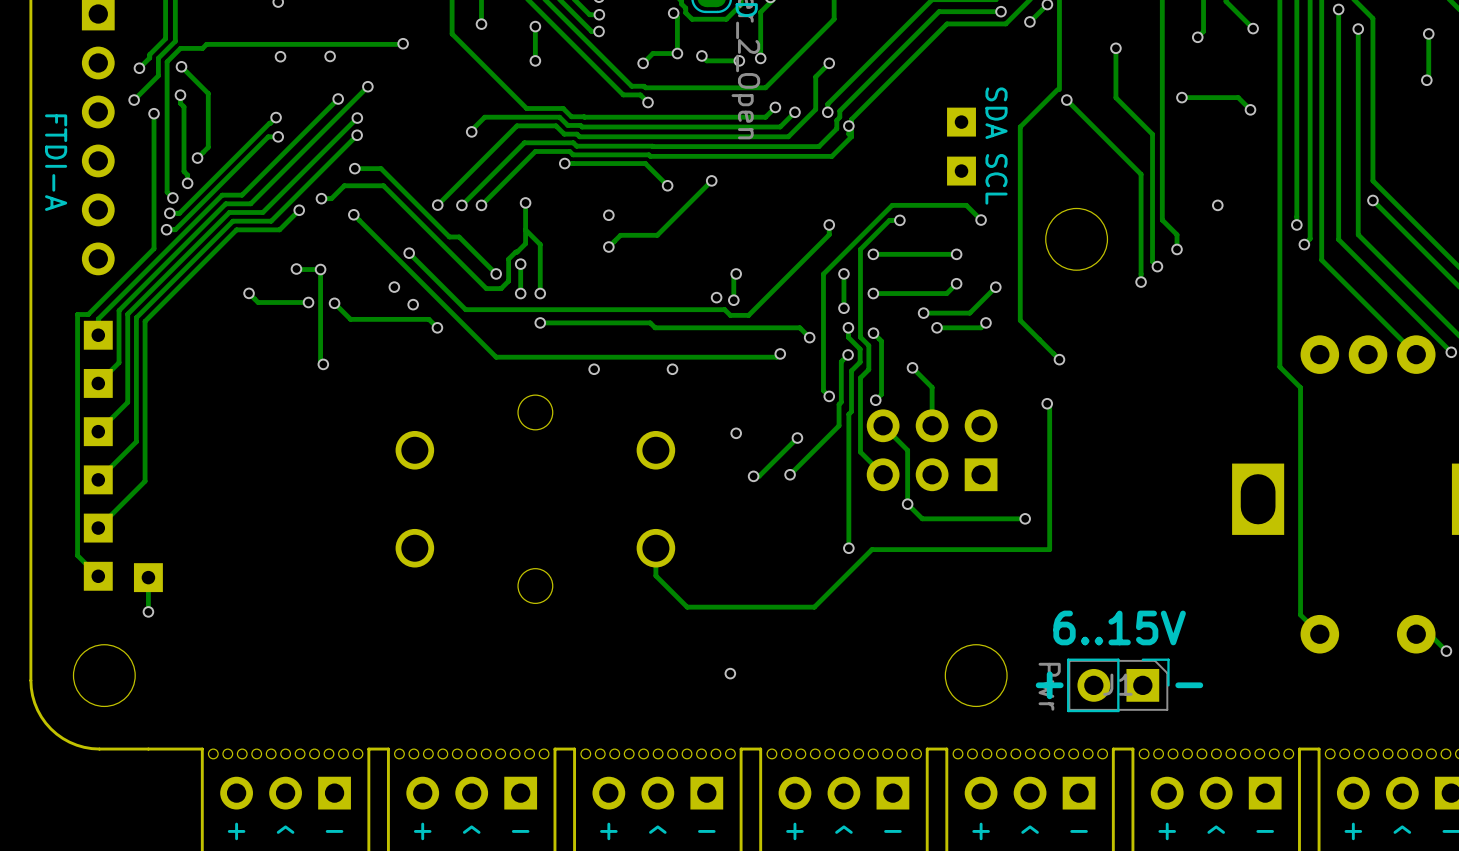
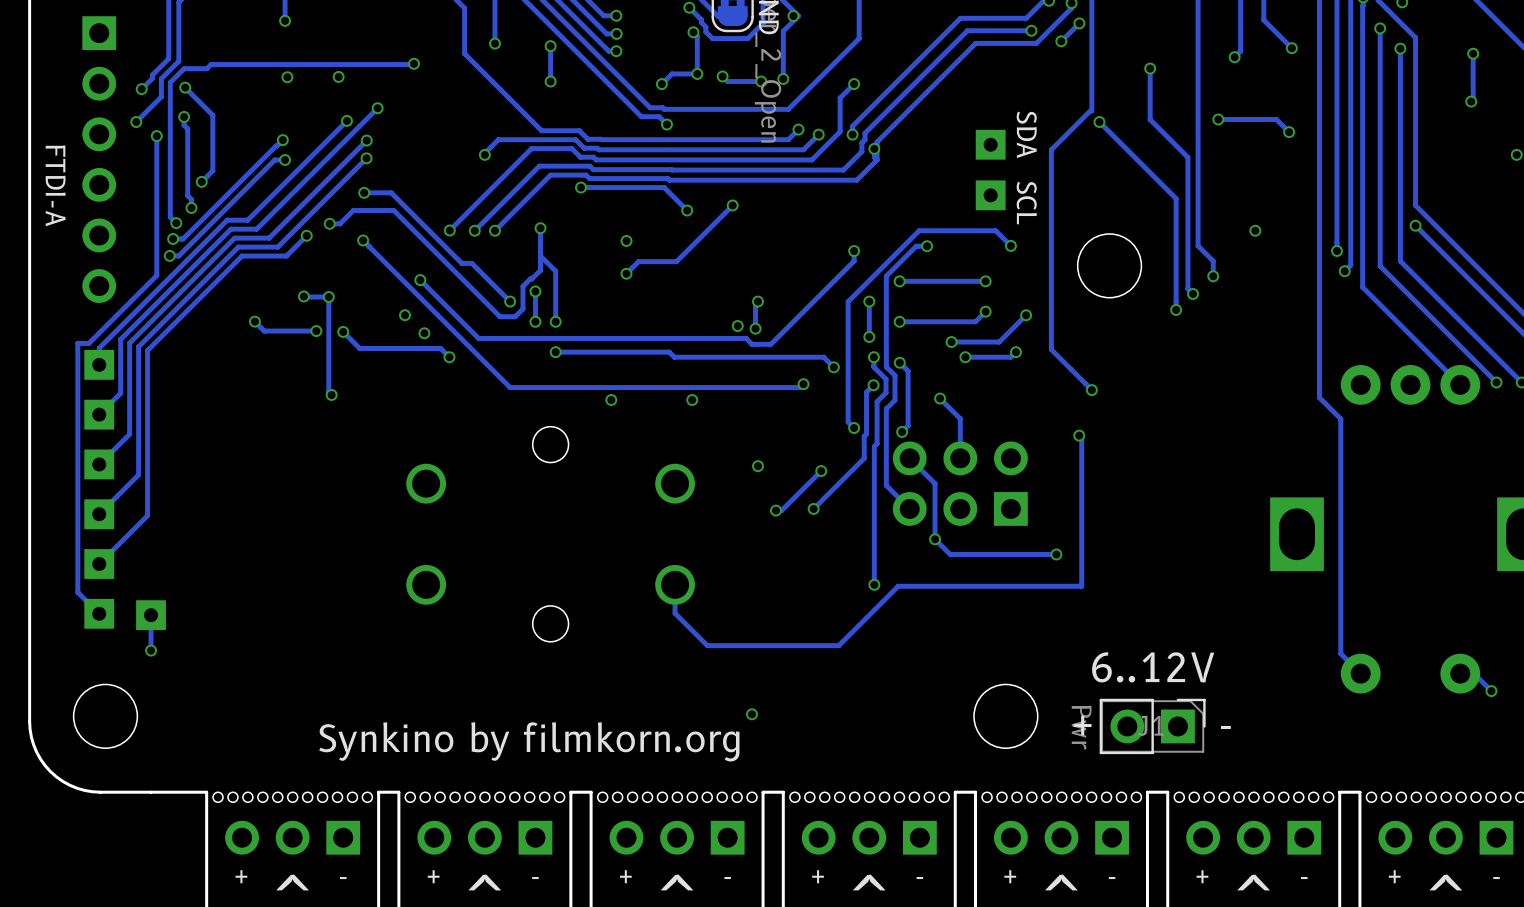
text: 6..15V (1119, 627) -> 6..12V (1153, 667)
text: none -> Synkino by filmkorn.org (529, 741)

